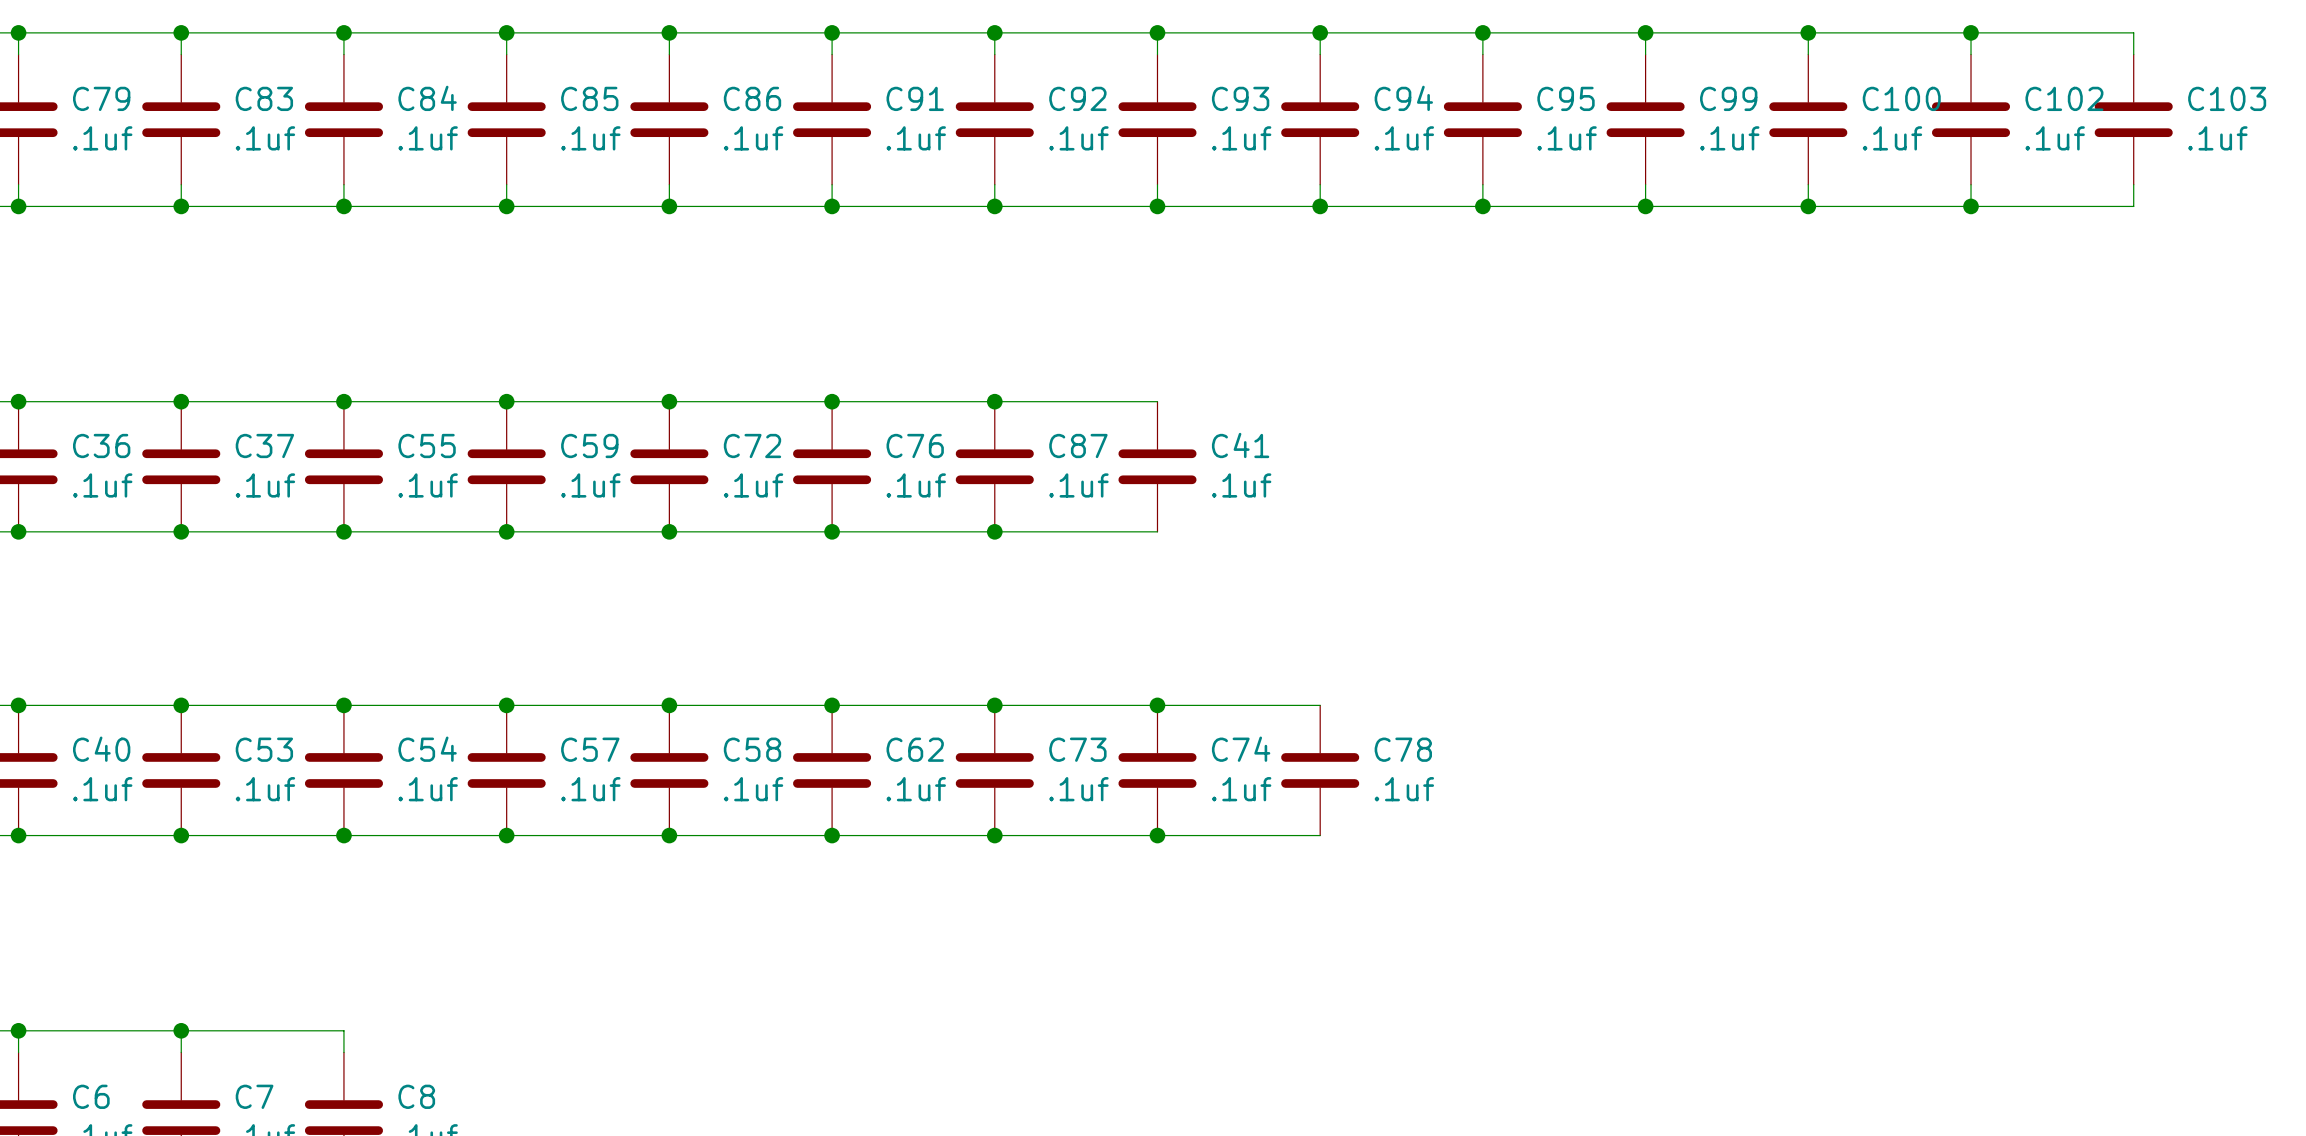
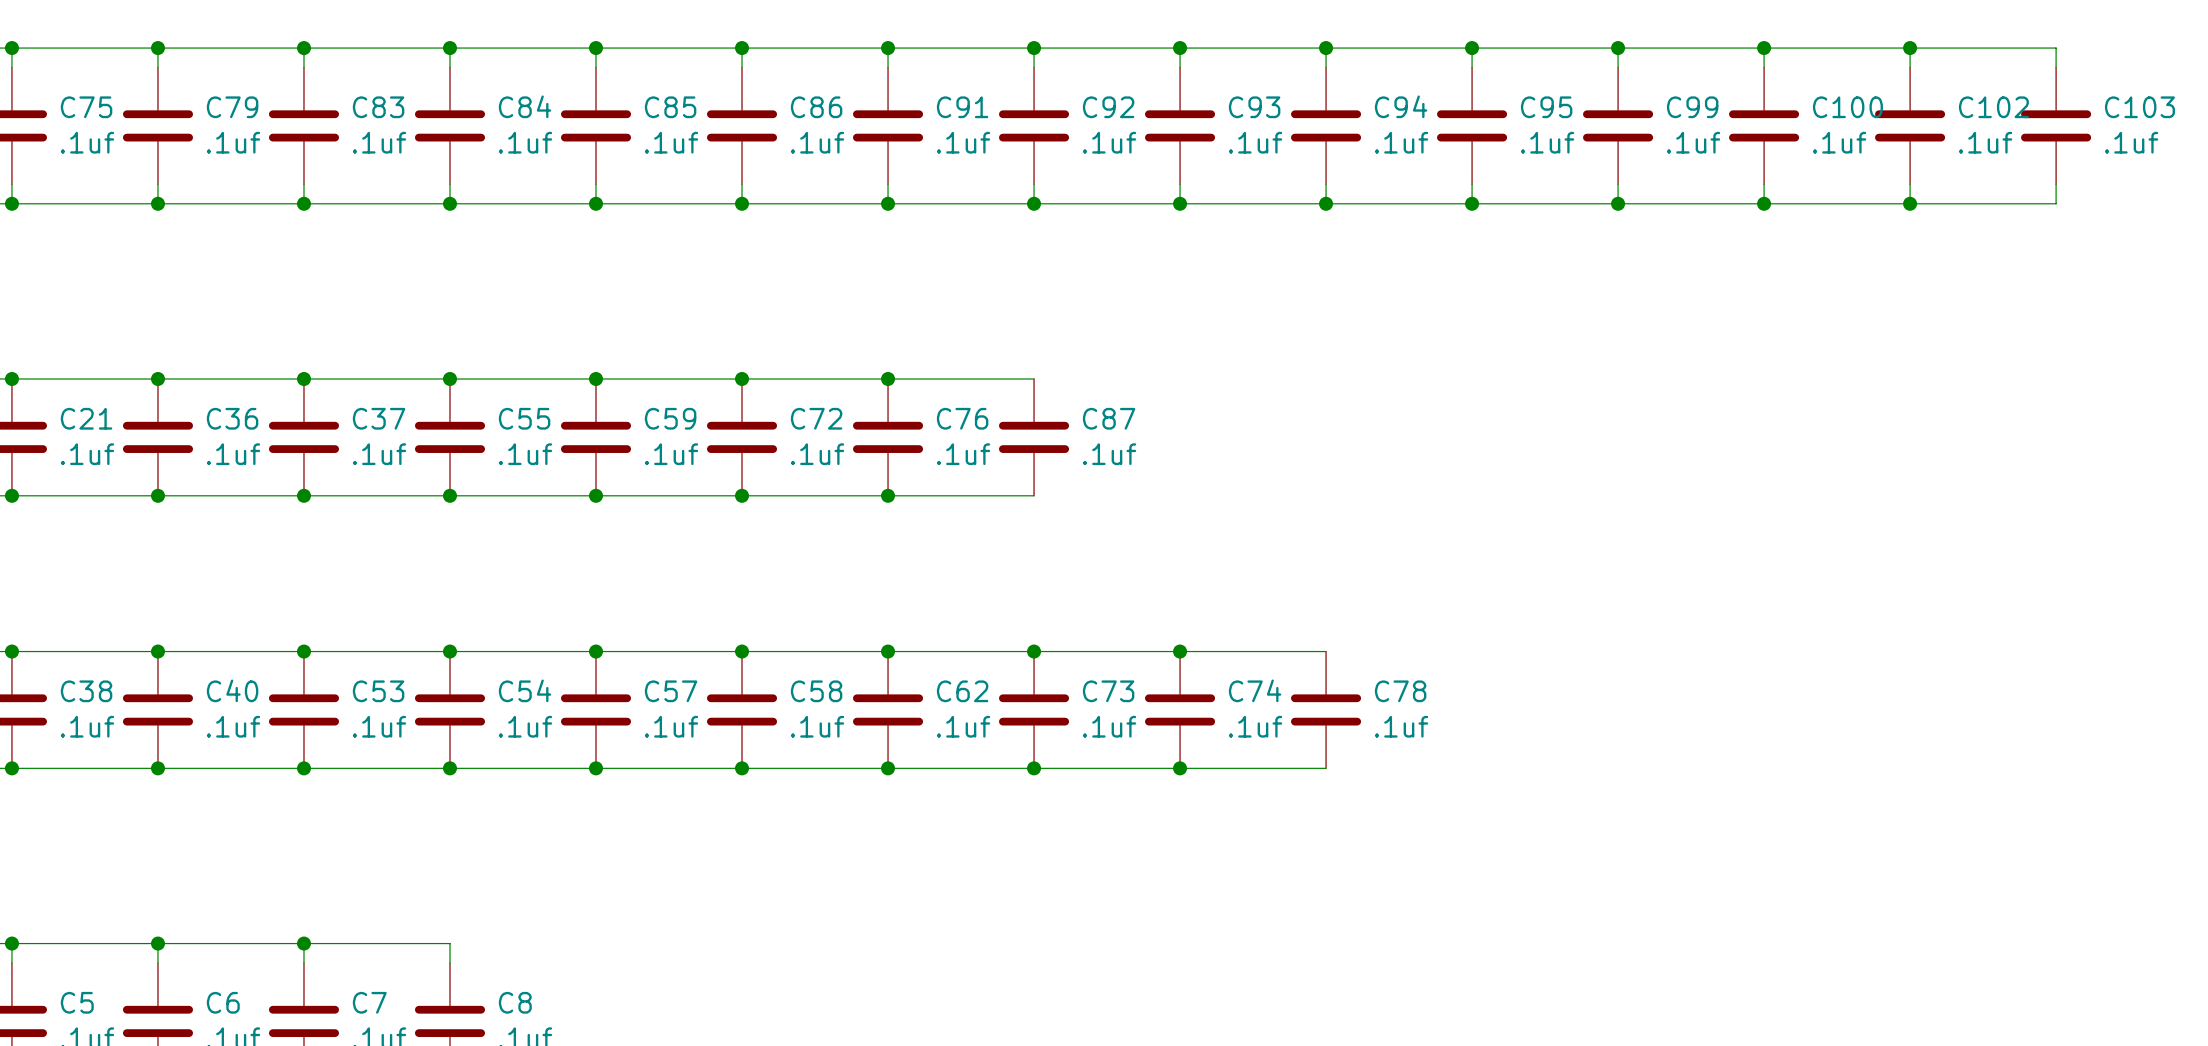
wire: (994, 401) (1157, 401) -> none
junction: (994, 401) -> none
C41: .1uf (1157, 466) -> none
wire: (994, 531) (1157, 531) -> none
junction: (994, 531) -> none

